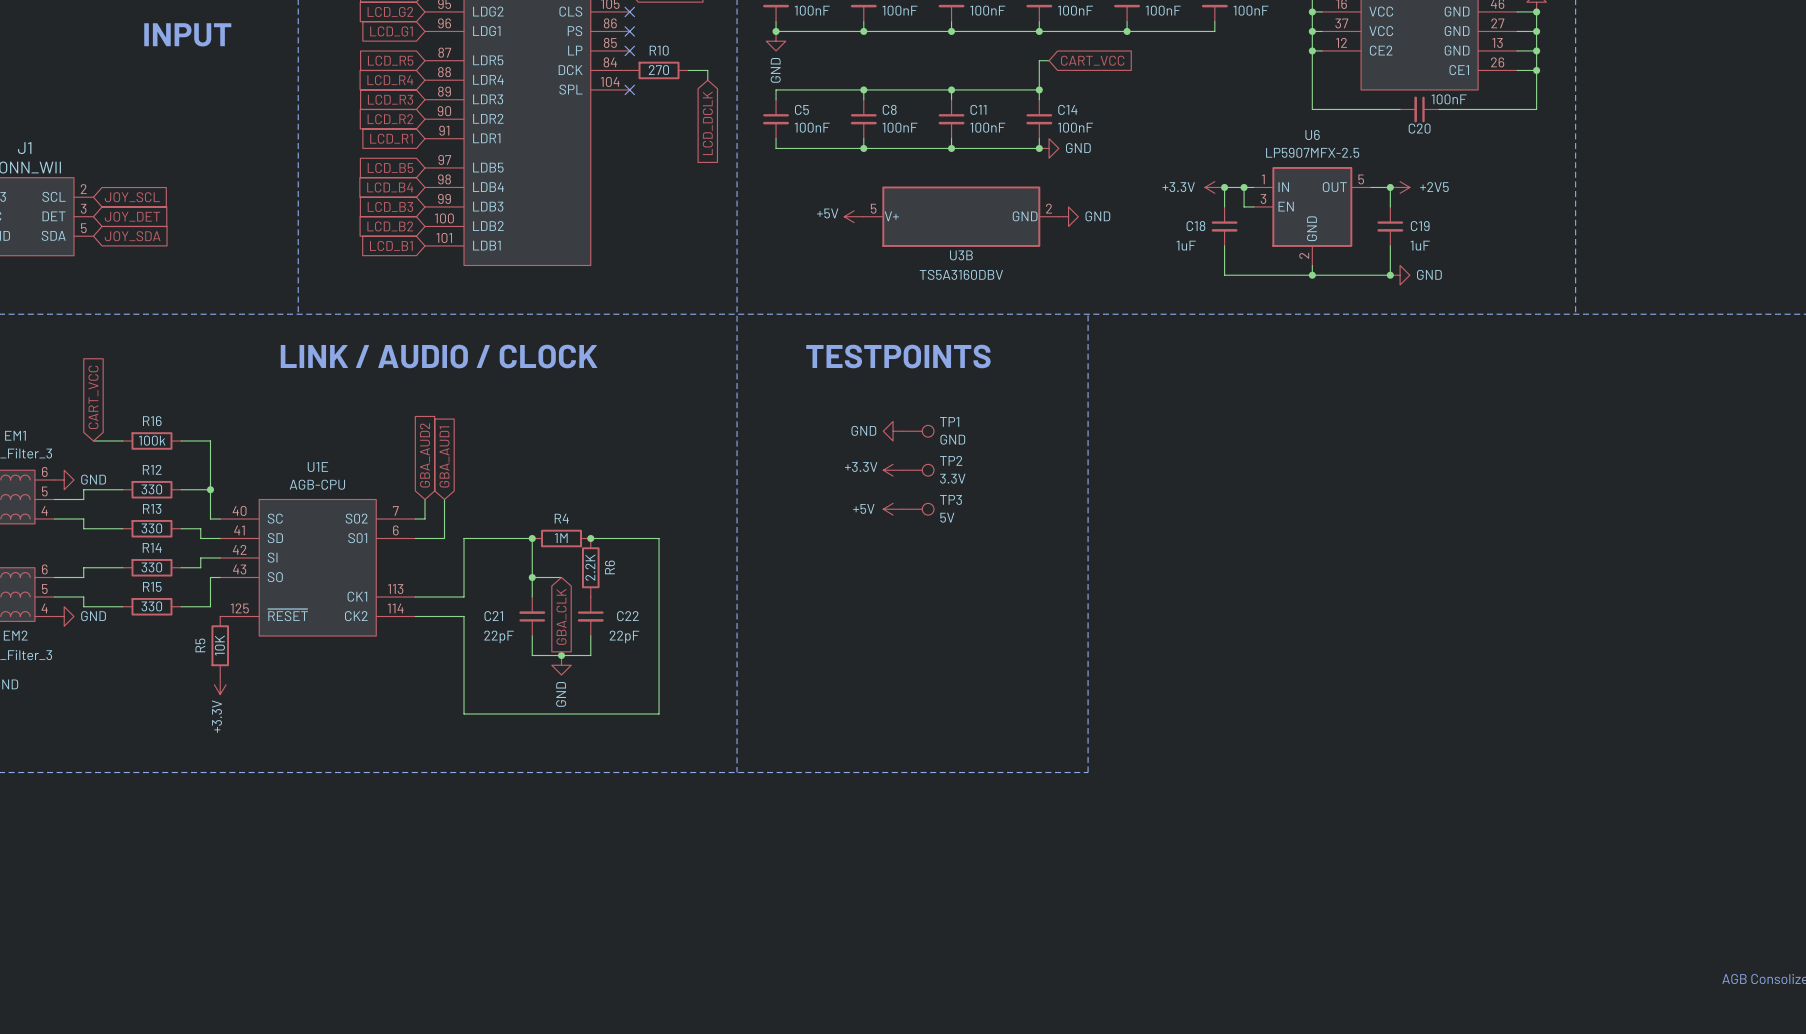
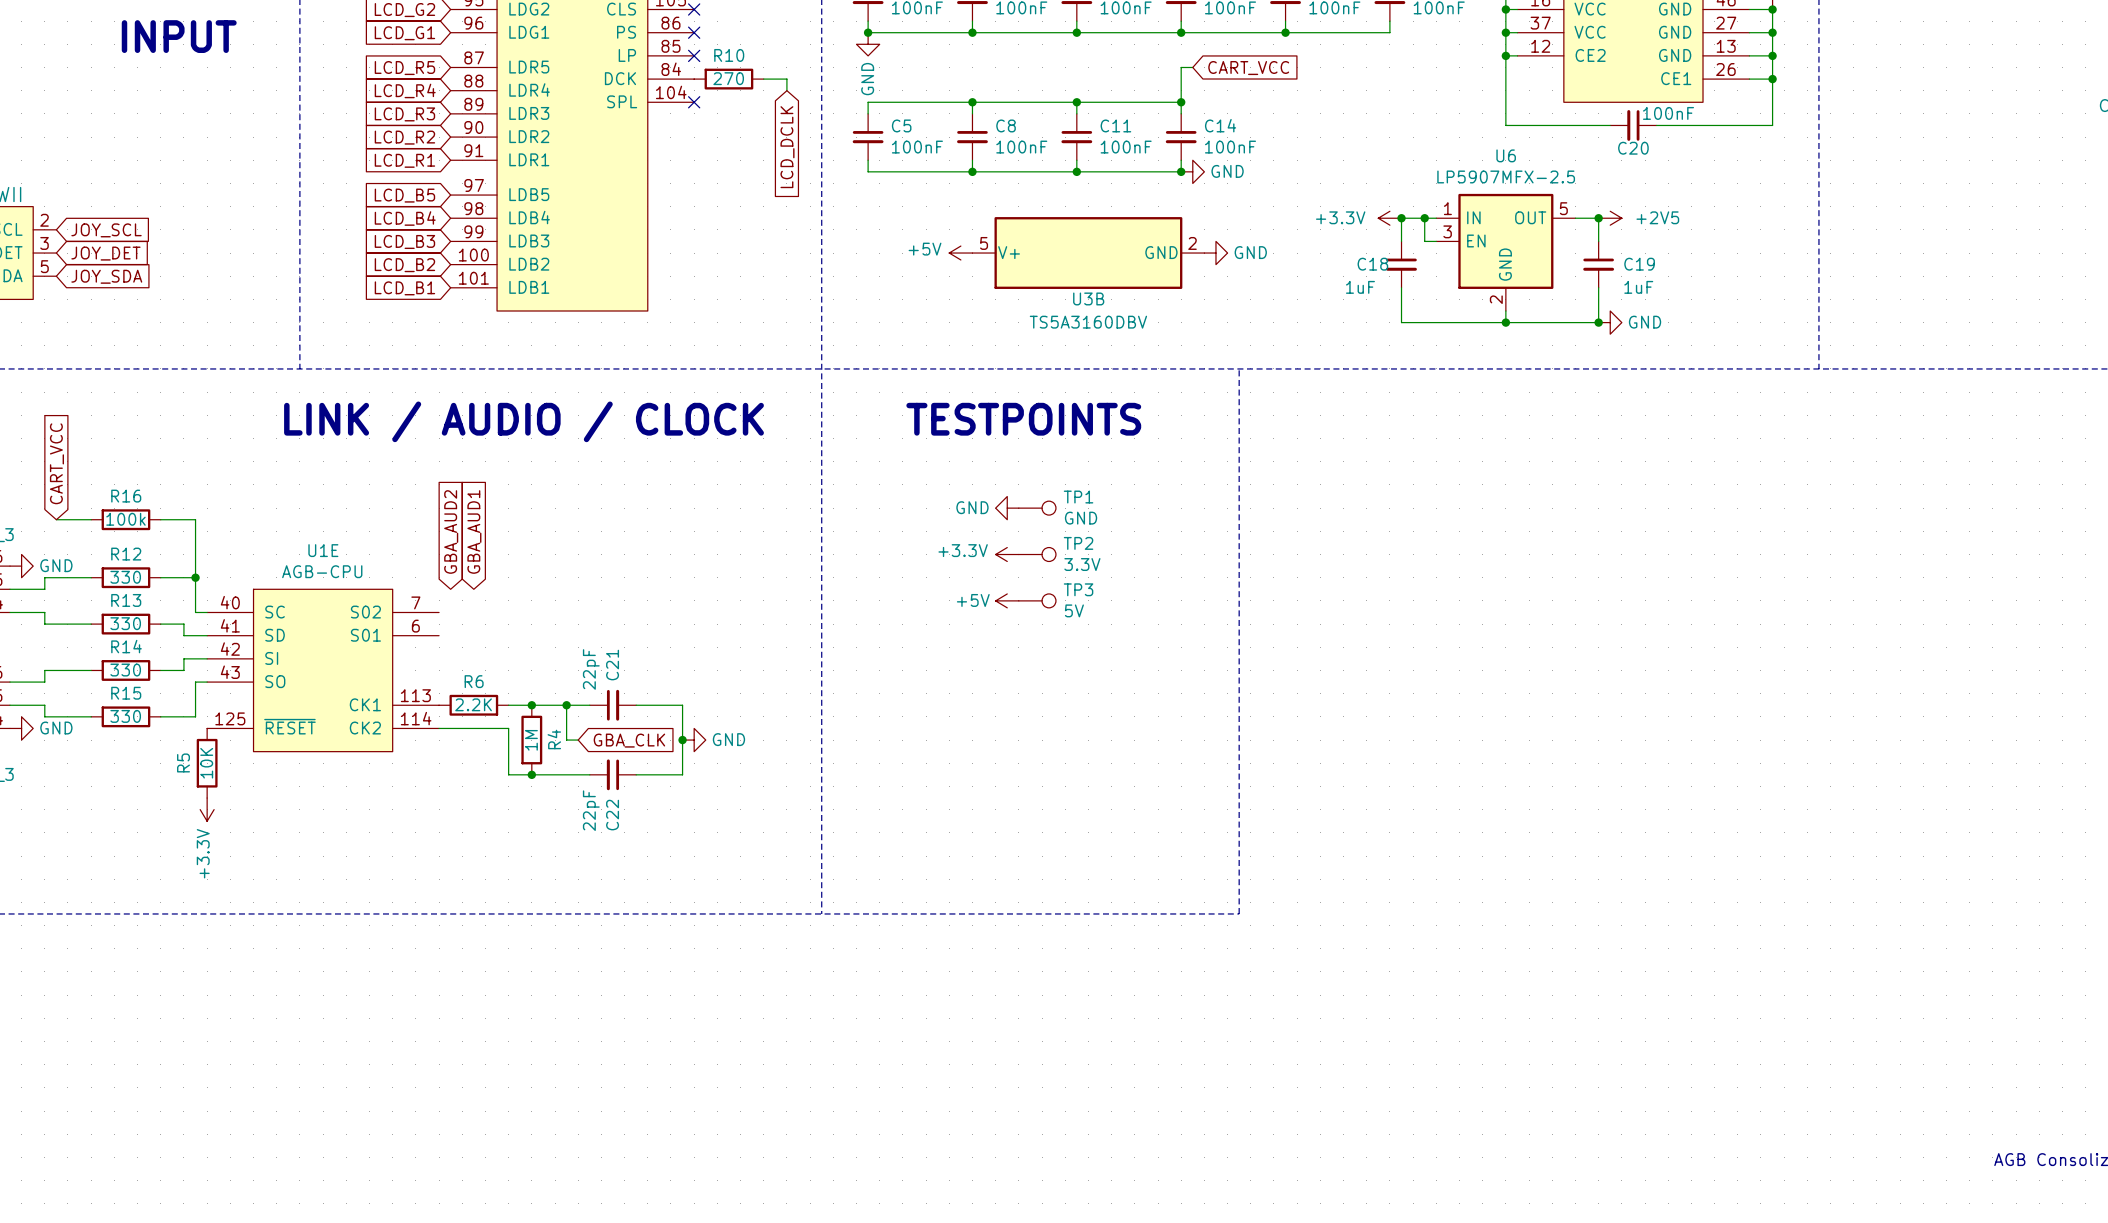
wire: (425, 499) (425, 518) (415, 518) -> none
wire: (444, 499) (444, 538) (415, 538) -> none
junction: (532, 538) -> none
R4 rotation: 0° (561, 538) -> 90° clockwise (531, 740)
R4 position: (561, 538) -> (531, 740)
wire: (590, 538) (659, 538) (659, 714) (464, 714) (464, 616) -> none
junction: (590, 538) -> none
R6 rotation: 0° (590, 567) -> 90° clockwise (473, 705)
R6 position: (590, 567) -> (473, 705)
R6 name position: R6 (609, 567) -> R6 (474, 681)
wire: (532, 577) (561, 577) -> none
junction: (532, 577) -> none
wire: (415, 597) (464, 597) (464, 538) (532, 538) (532, 597) -> none
wire: none -> (508, 705) (589, 705)
junction: none -> (531, 705)
wire: none -> (566, 705) (566, 740) (578, 740)
junction: none -> (566, 705)
C21 rotation: 0° (532, 616) -> 90° clockwise (613, 705)
C21 position: (532, 616) -> (612, 705)
global label rotation: 0° (561, 616) -> 90° counterclockwise (629, 740)
C22 rotation: 0° (590, 616) -> 90° clockwise (612, 774)
C22 position: (590, 616) -> (612, 774)
junction: none -> (682, 740)
wire: (532, 636) (532, 655) -> (497, 728) (508, 728) (508, 774) (578, 774)
wire: (590, 636) (590, 655) -> (636, 705) (682, 705) (682, 774) (647, 774)
junction: none -> (531, 774)
junction: (561, 655) -> none
power symbol rotation: 0° (561, 665) -> 90° counterclockwise (694, 740)
power symbol position: GND (561, 665) -> GND (694, 740)

